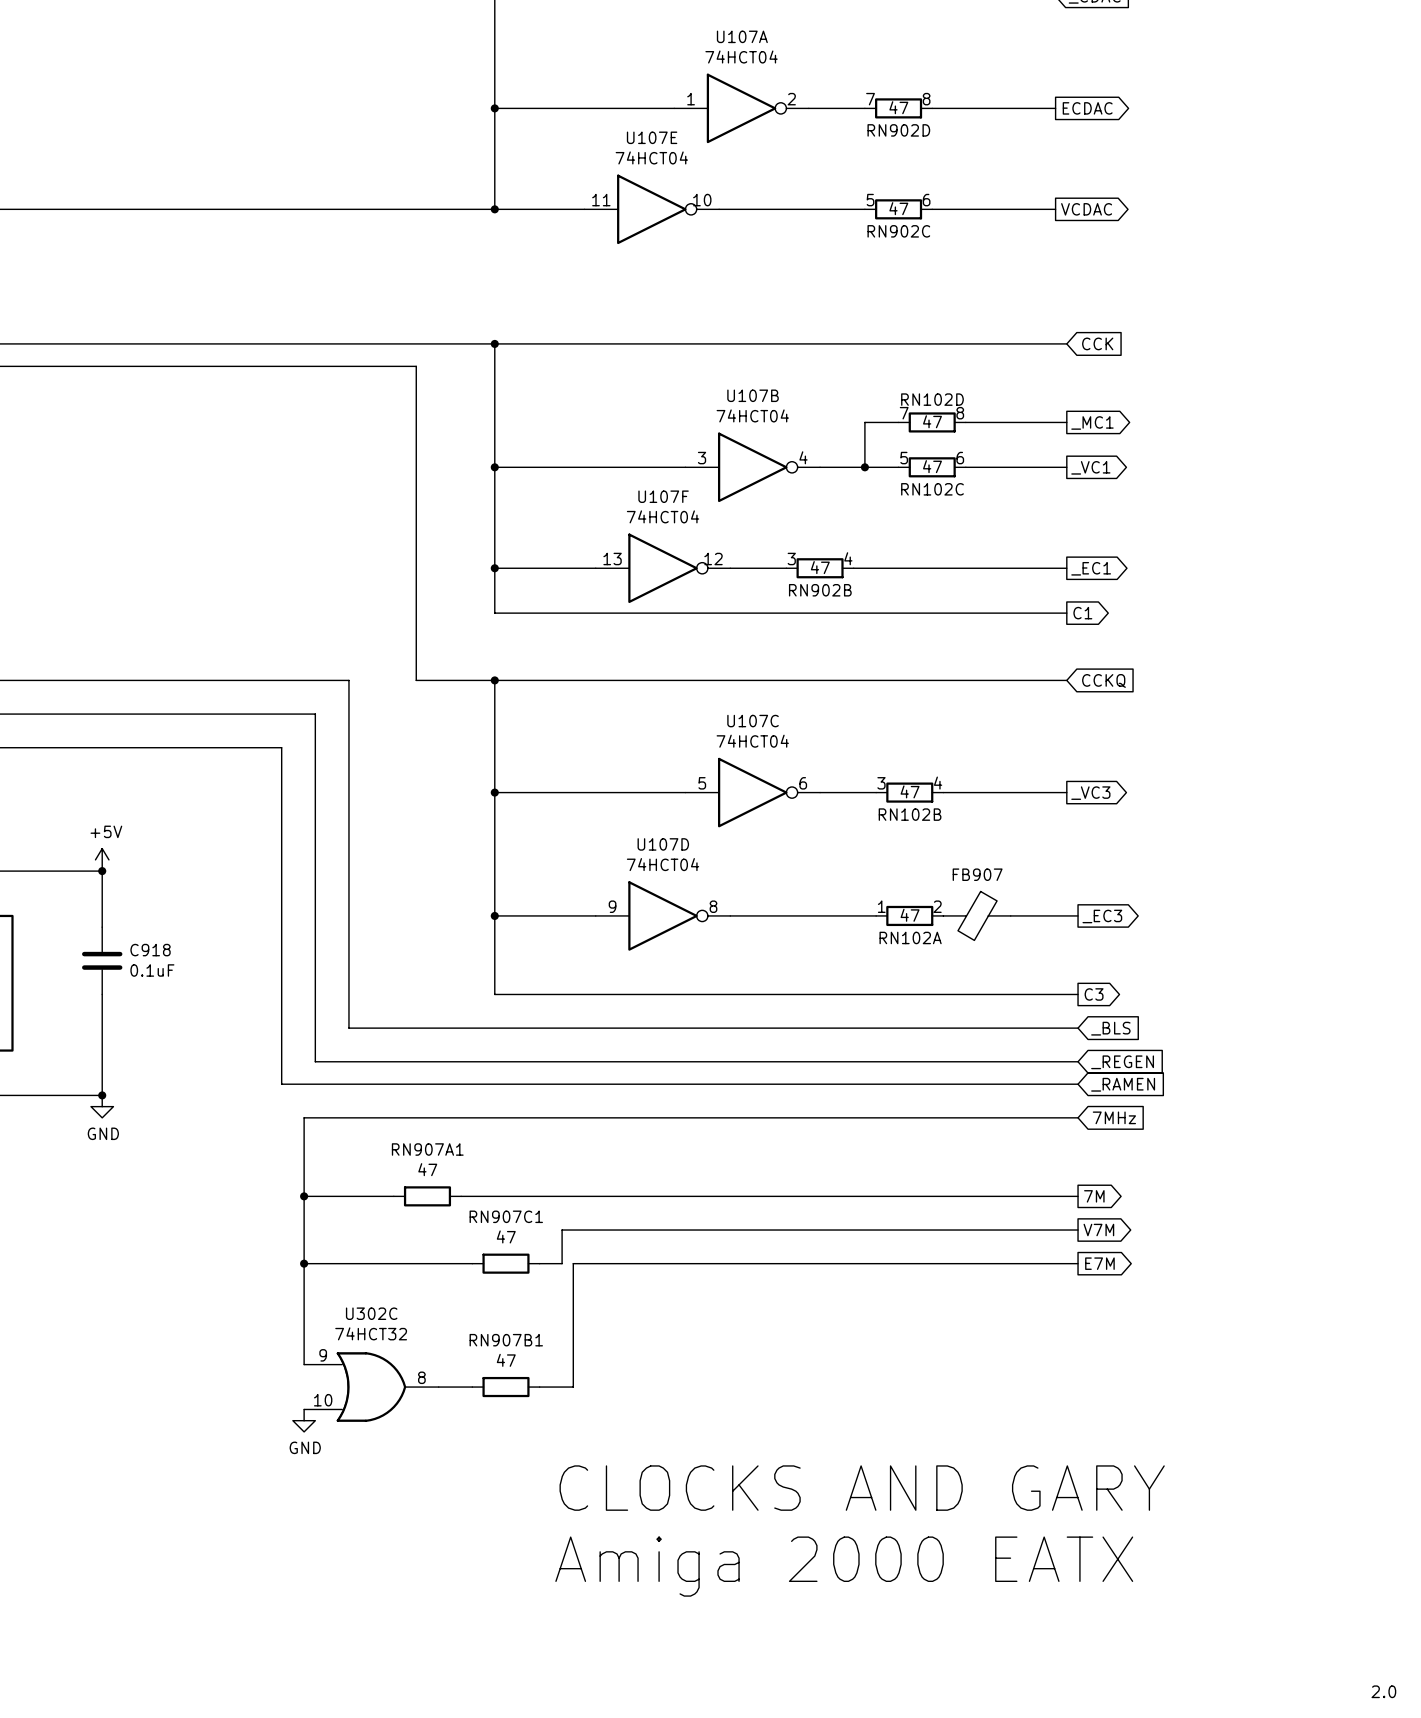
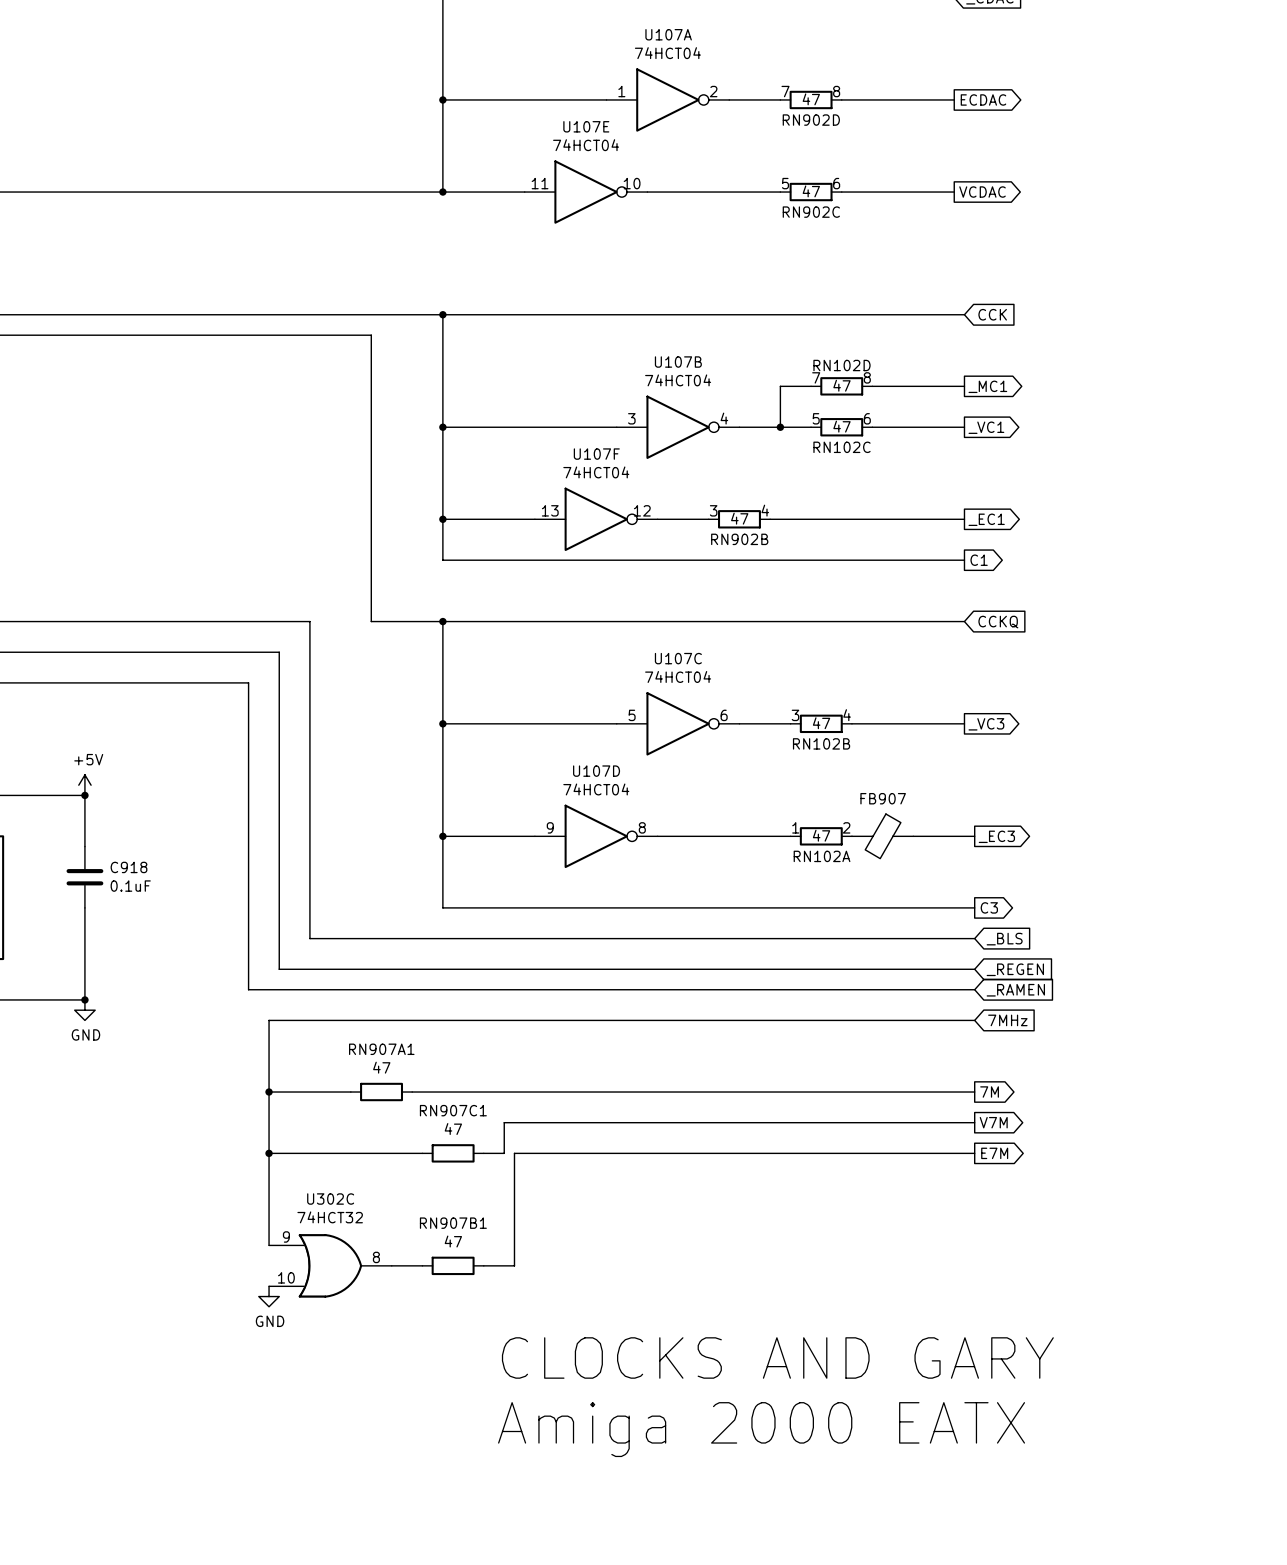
text: 2.0 (1383, 1691) -> none

